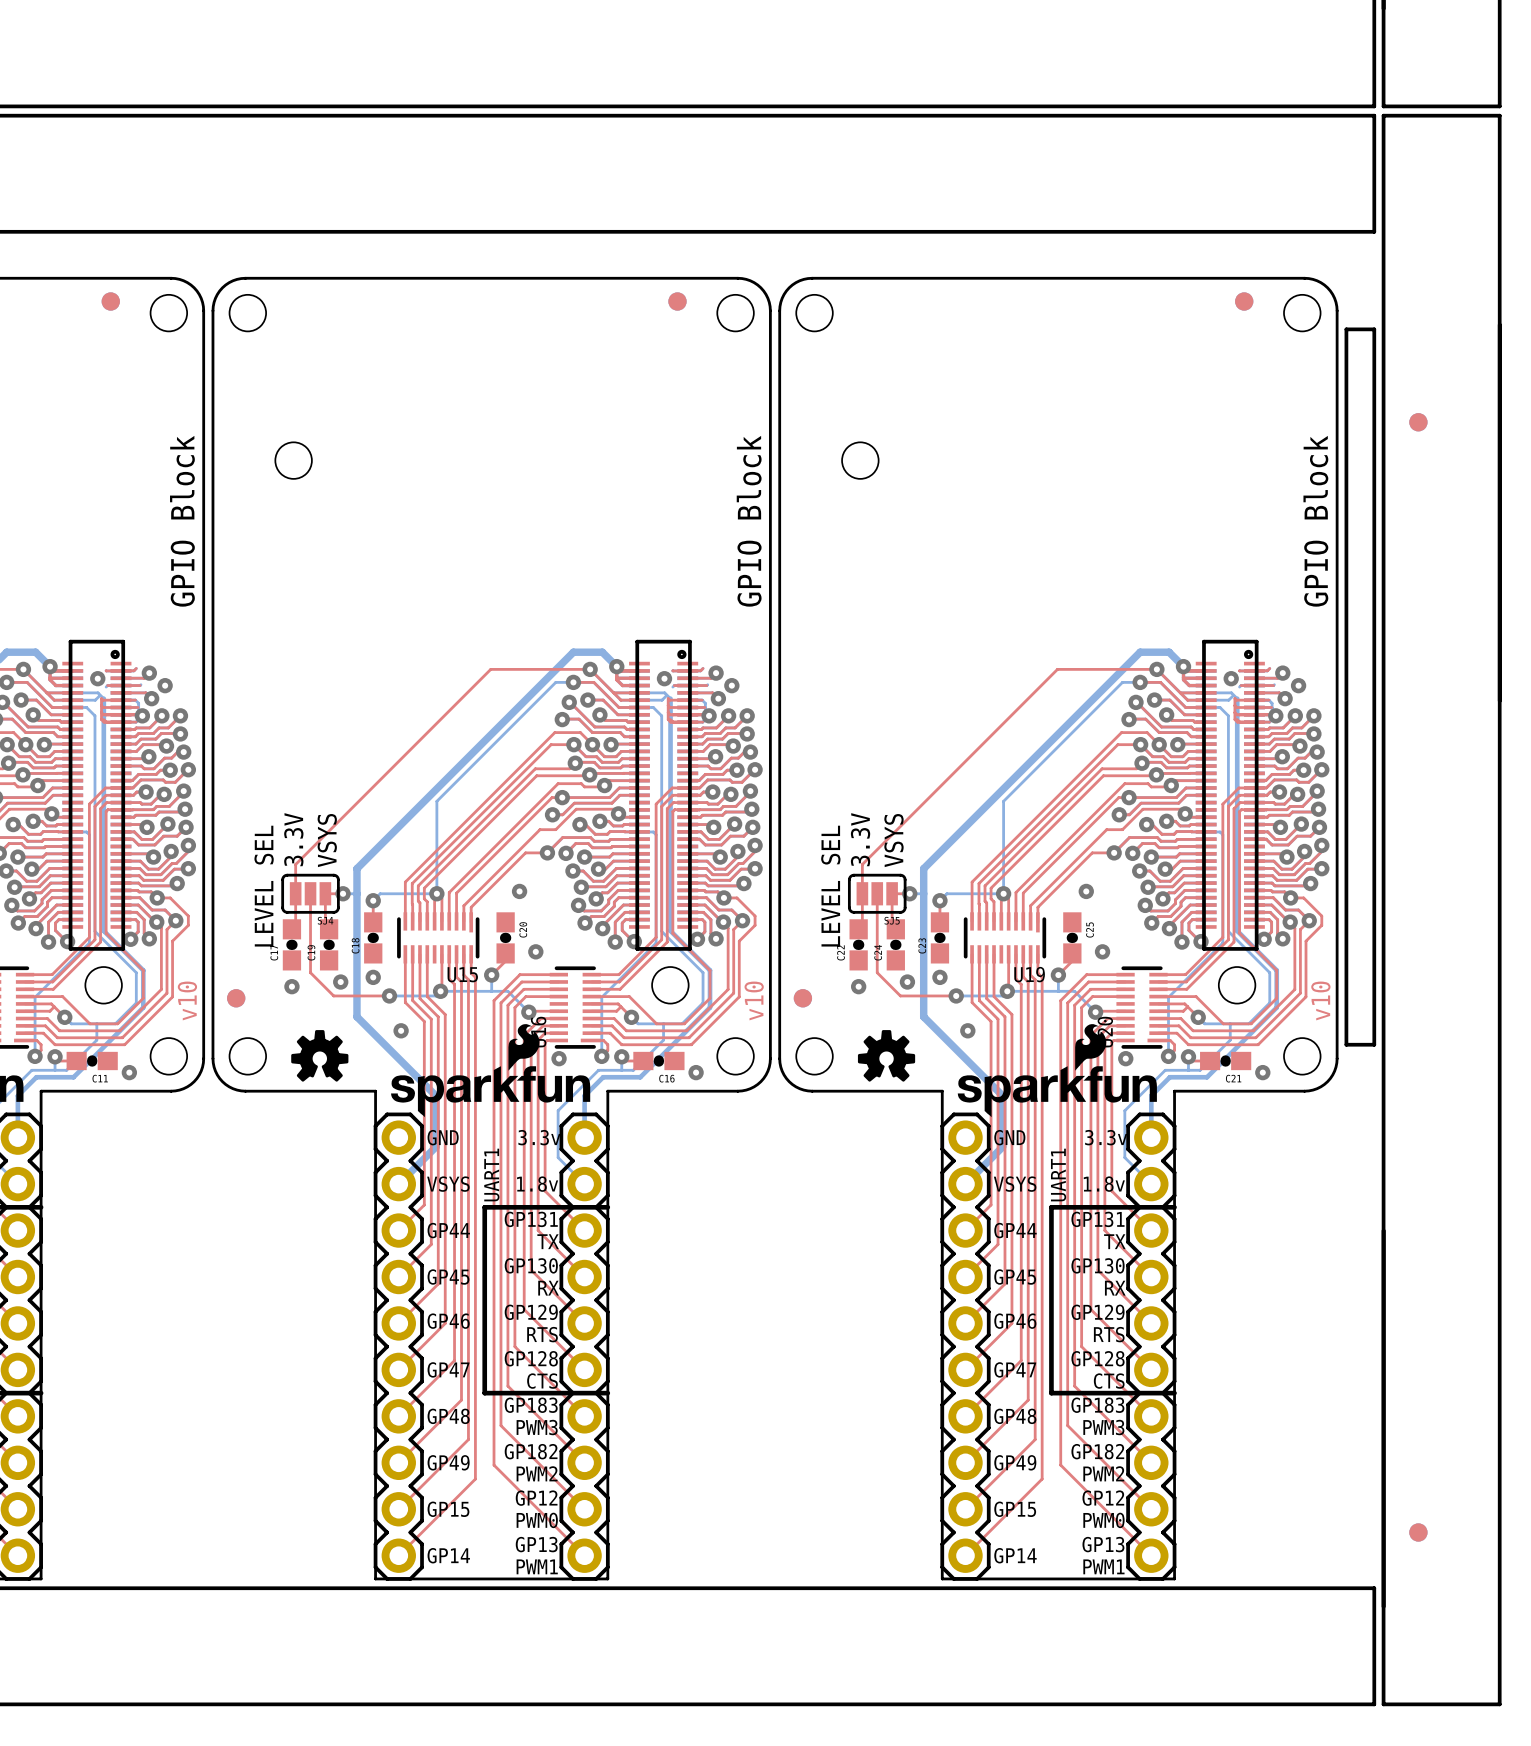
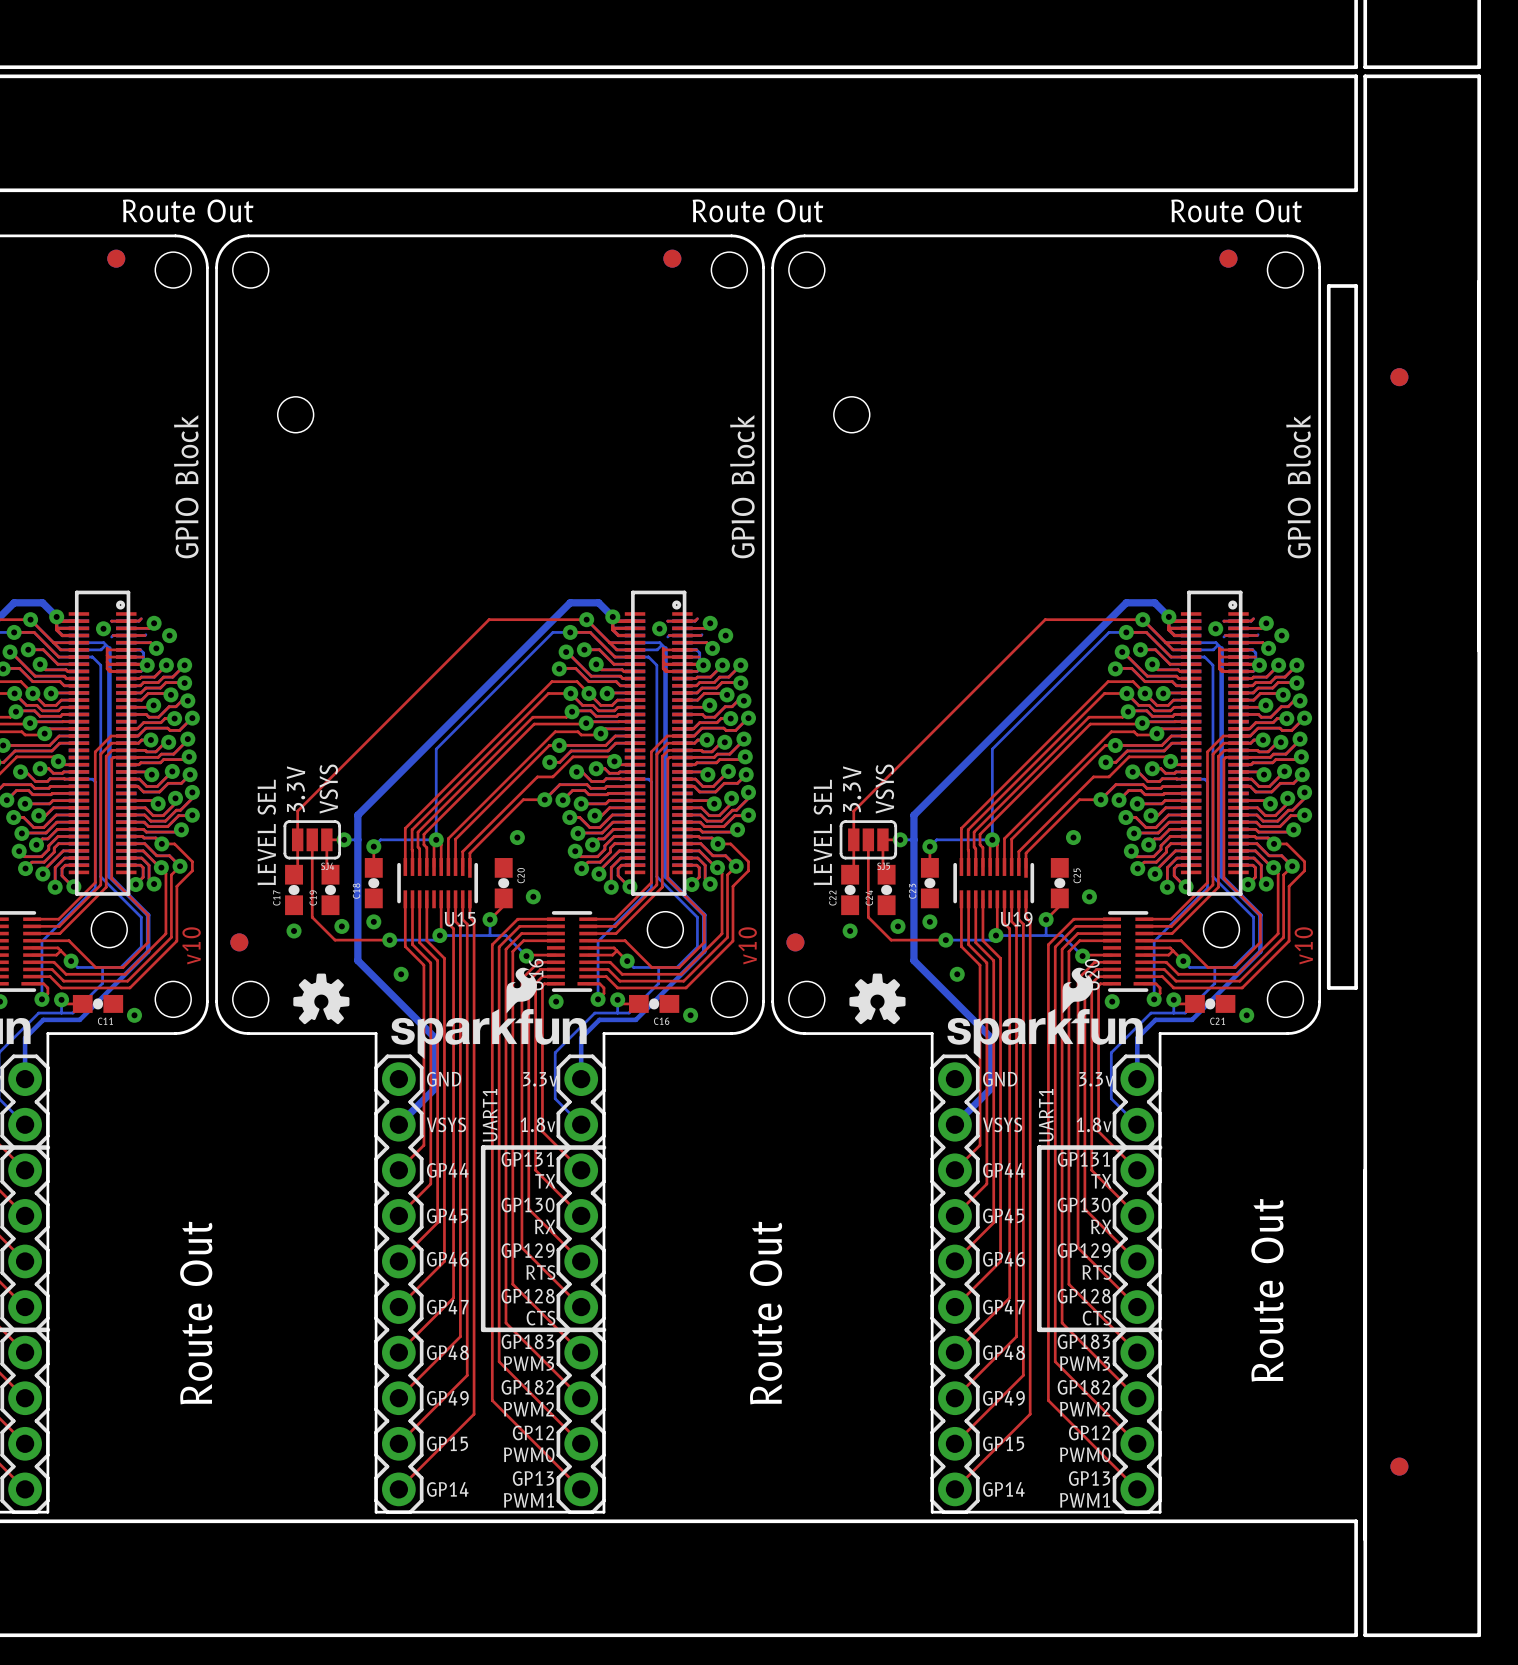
text: none -> Route Out (188, 210)
text: none -> Route Out (757, 210)
text: none -> Route Out (1236, 210)
text: none -> Route Out (1267, 1290)
text: none -> Route Out (196, 1313)
text: none -> Route Out (766, 1313)

